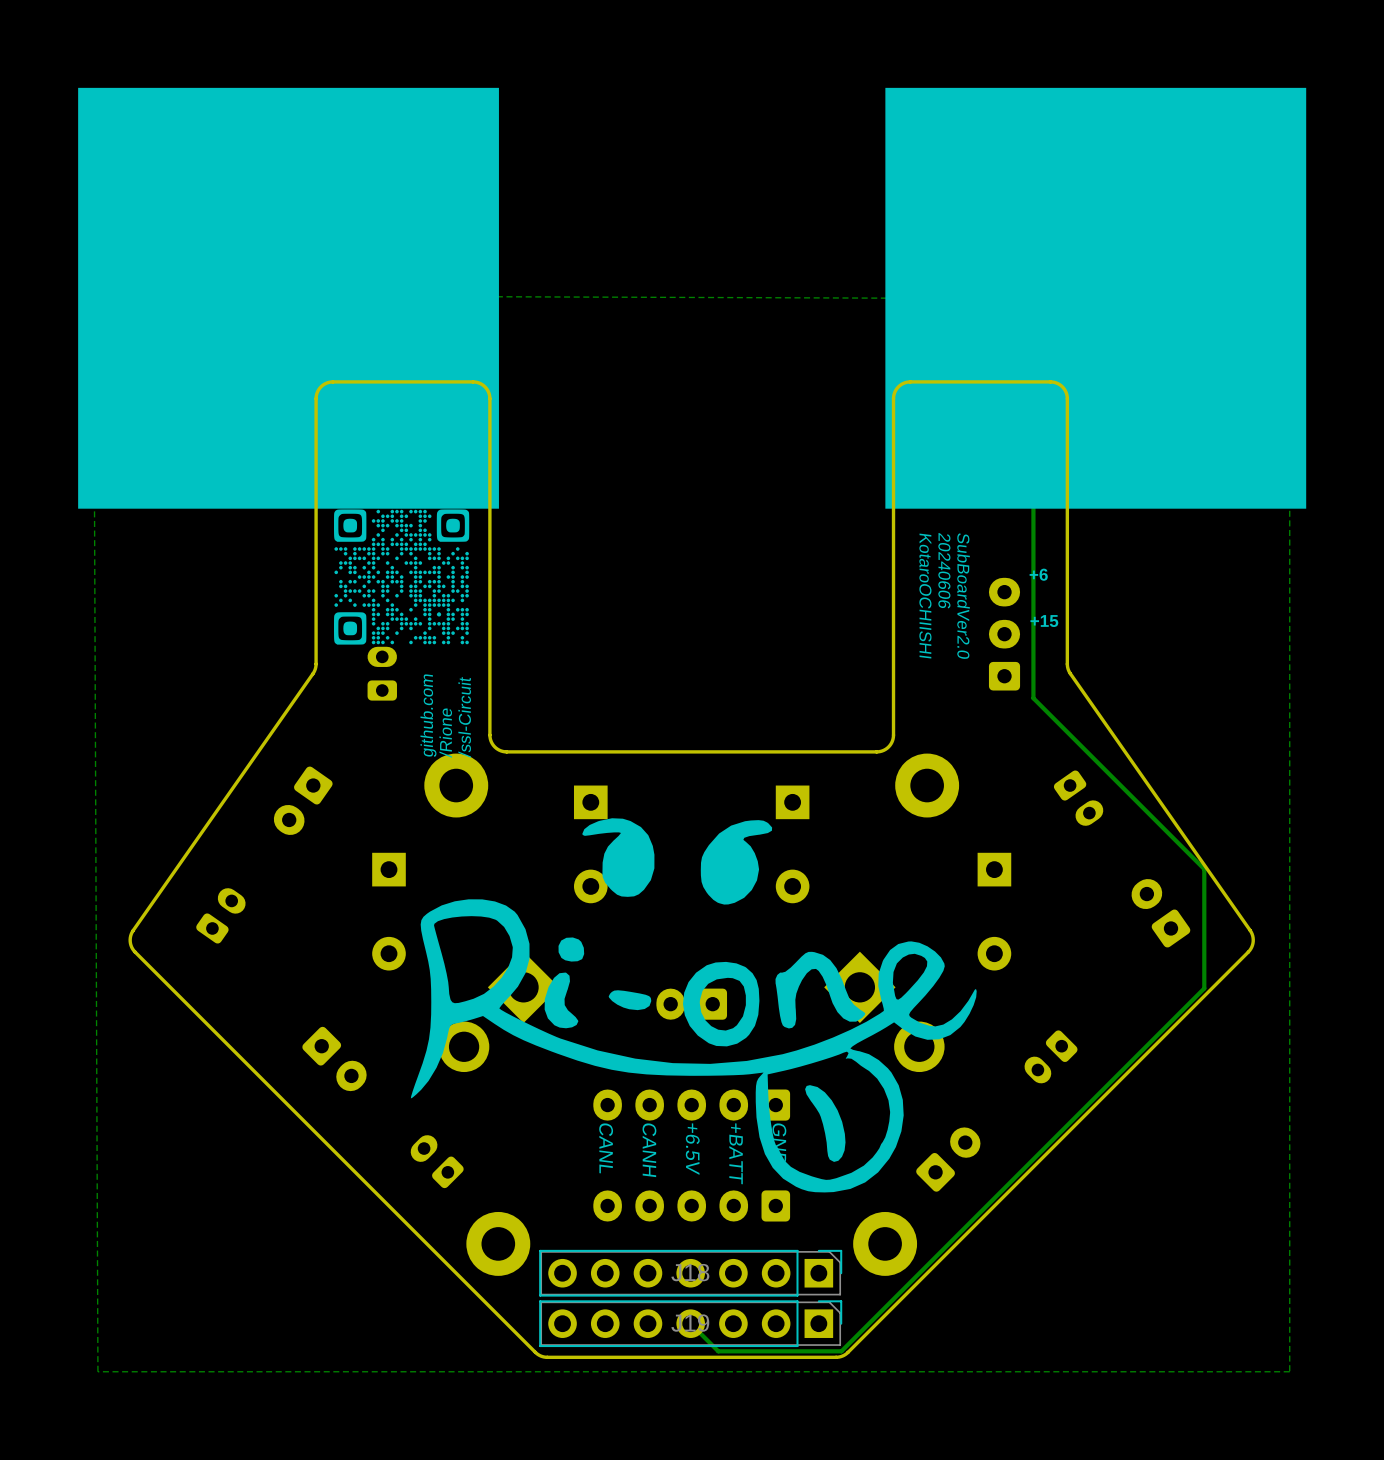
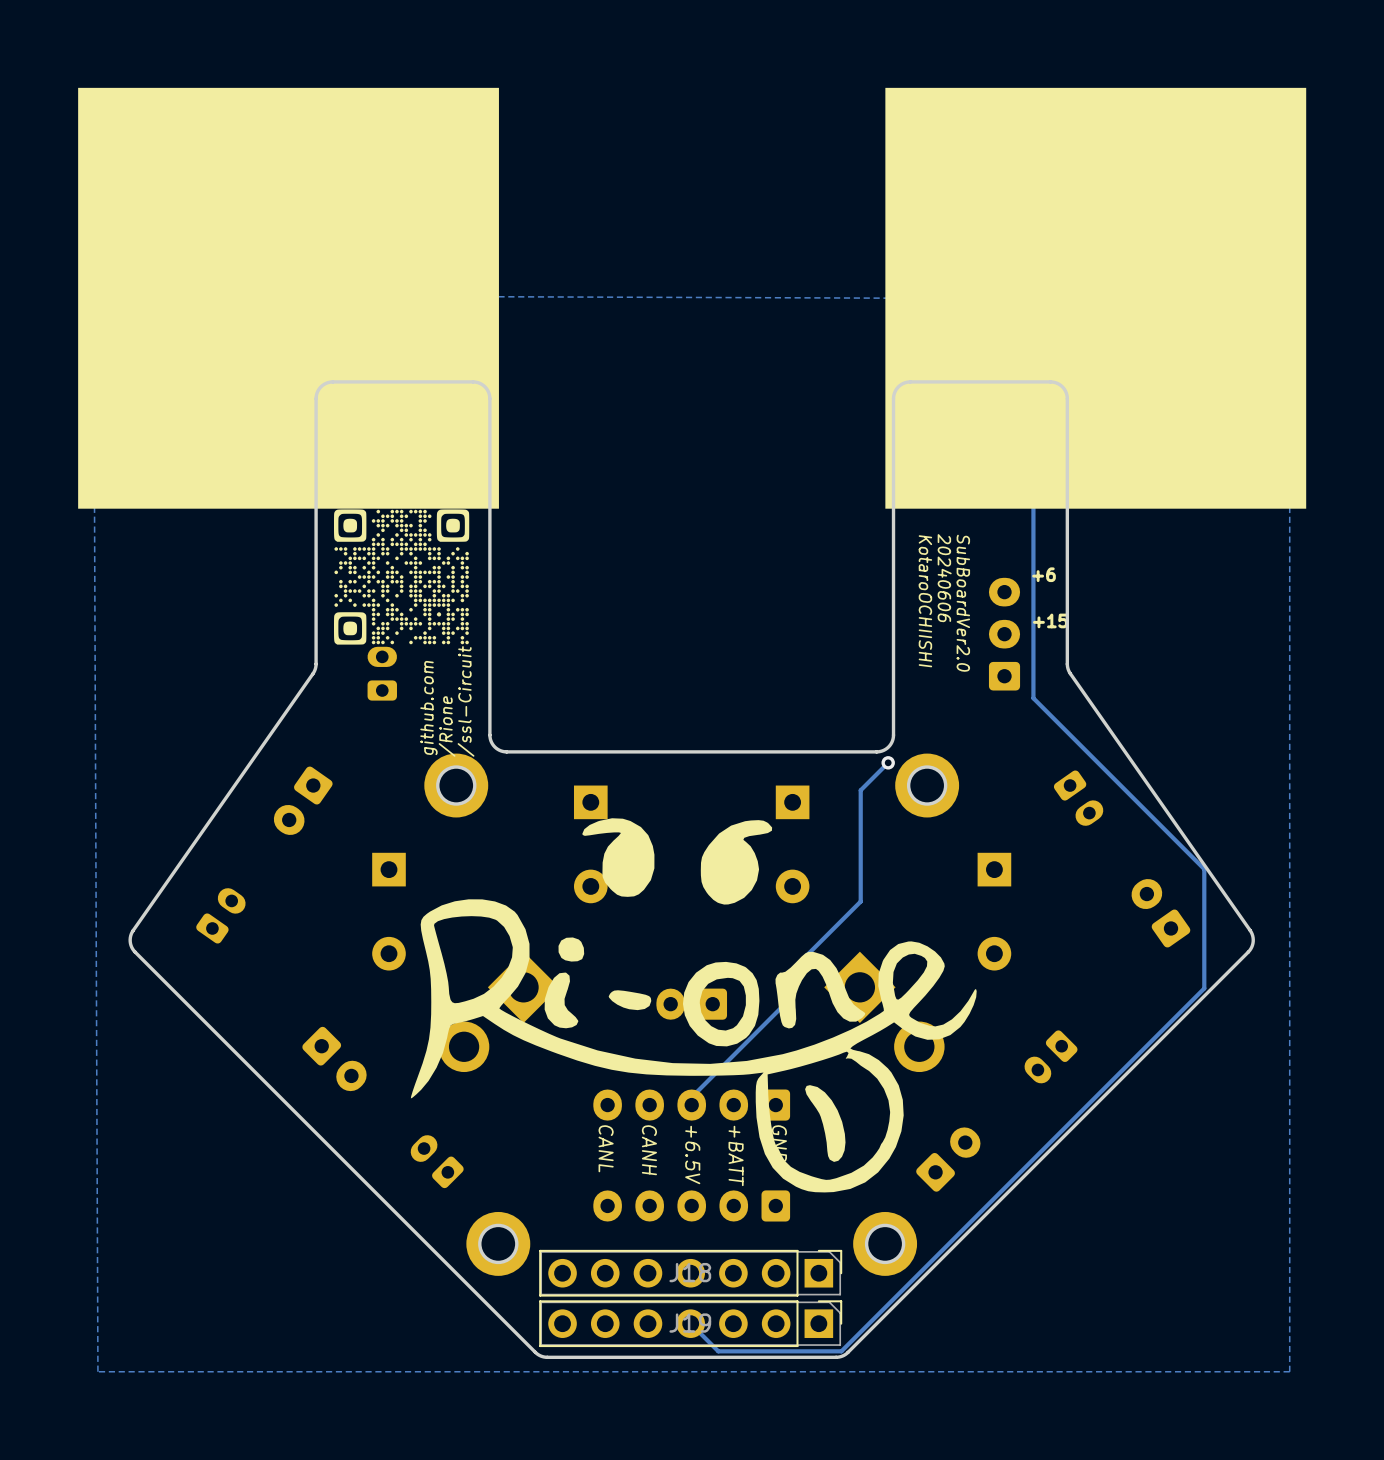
track: none -> (888, 762) (860, 790) (860, 901) (781, 980) (781, 1007) (691, 1097) (691, 1105)
via: none -> (888, 762)

